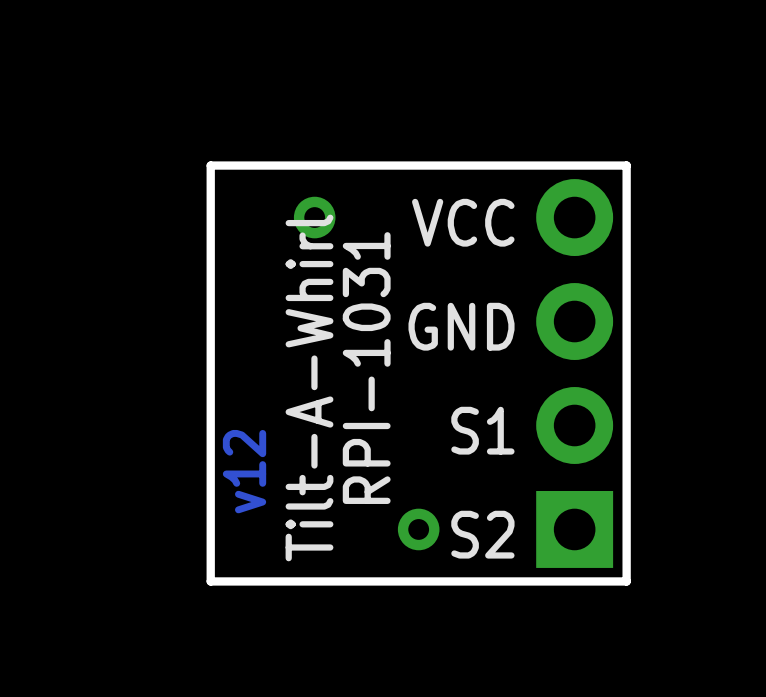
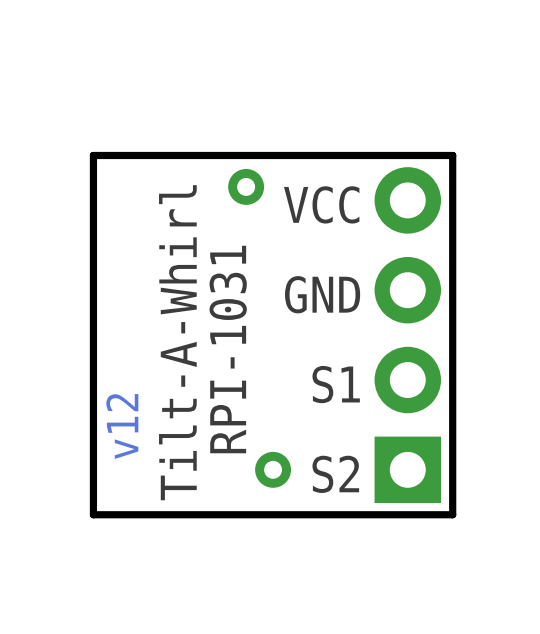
via position: (314, 217) -> (246, 186)

